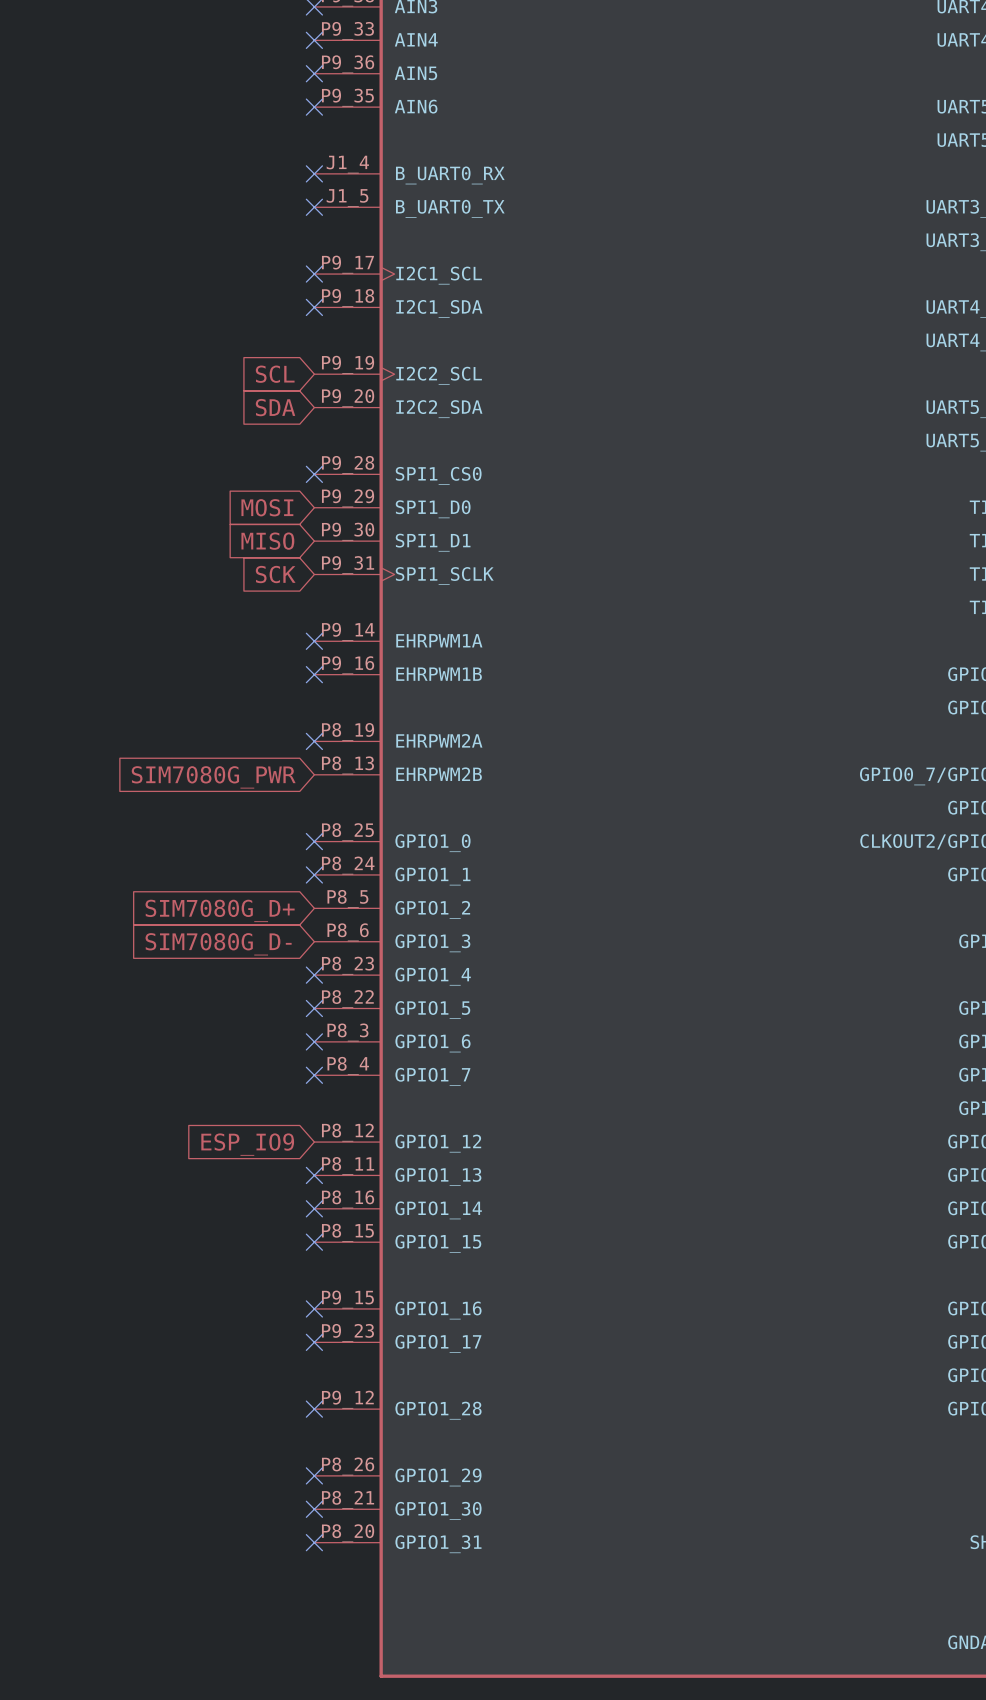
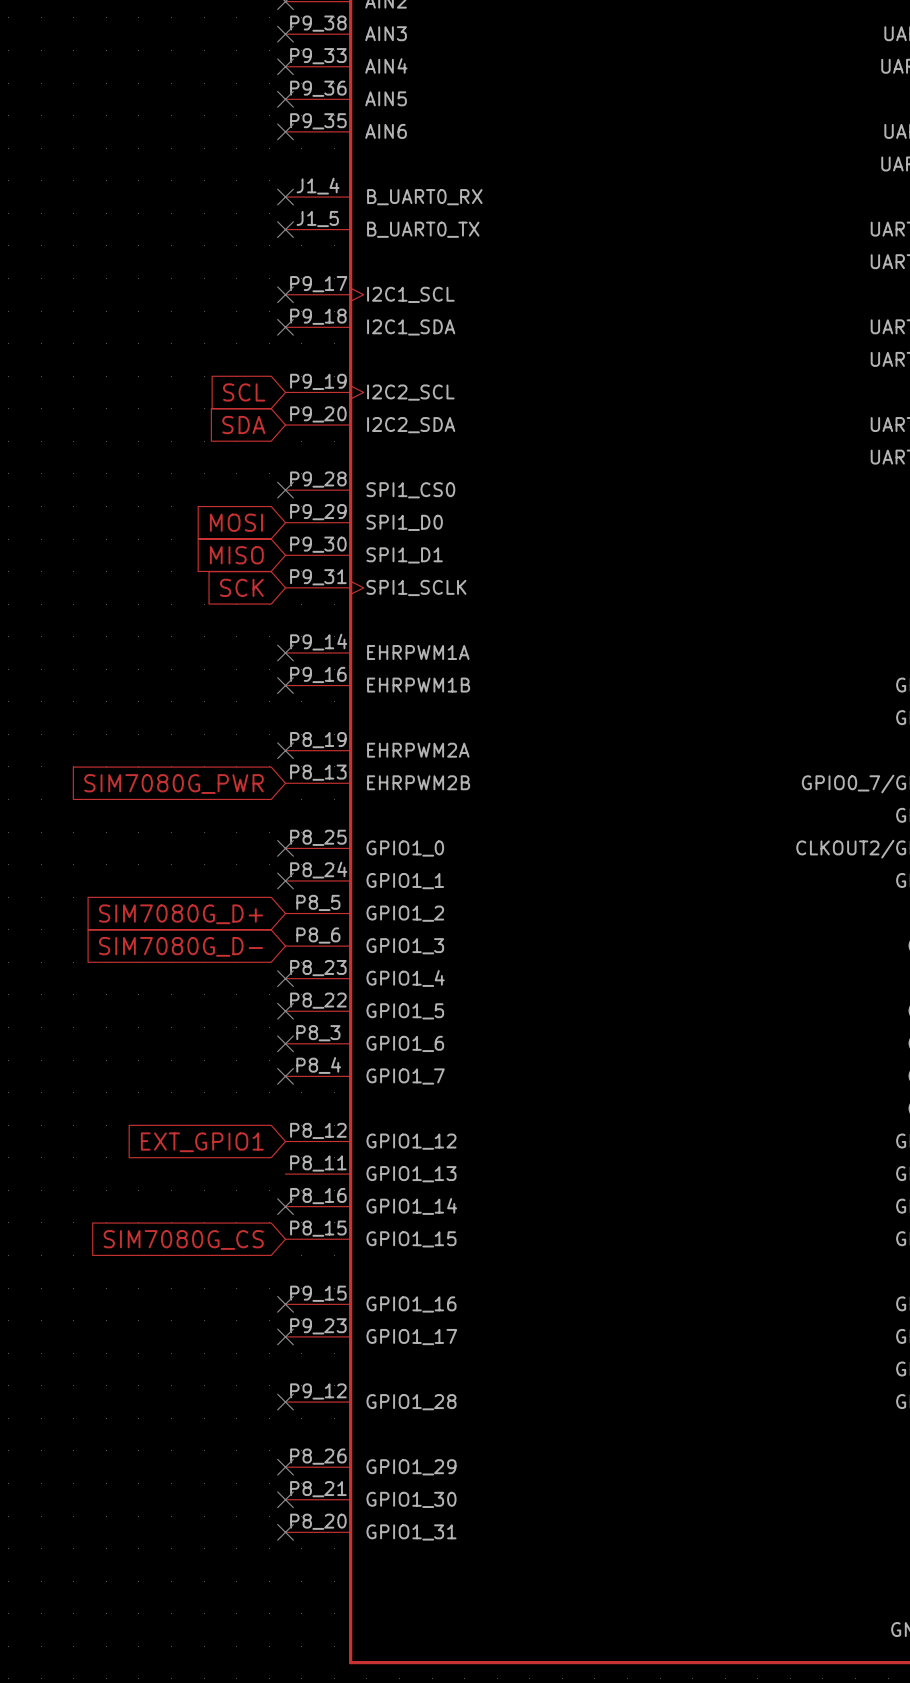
global label: ESP_IO9 (247, 1144) -> EXT_GPIO1 (202, 1142)
no-connect mark: (314, 1175) -> none
no-connect mark: (314, 1242) -> none
global label: none -> SIM7080G_CS (183, 1239)

